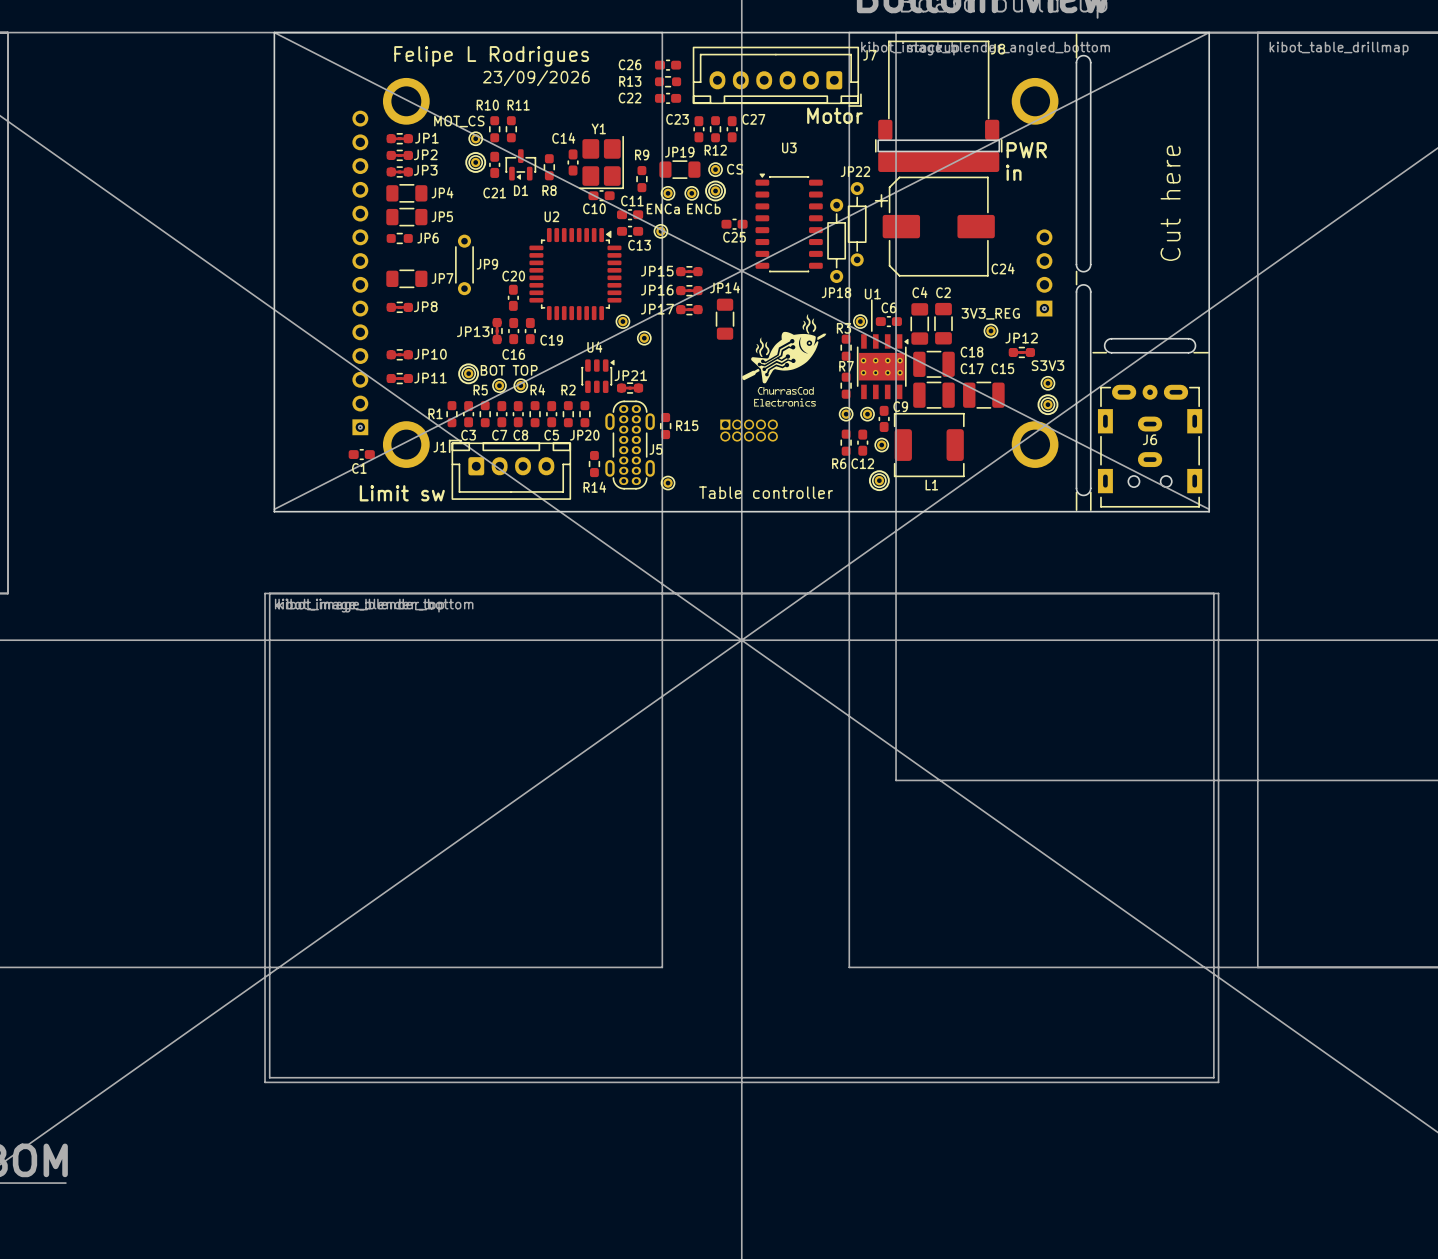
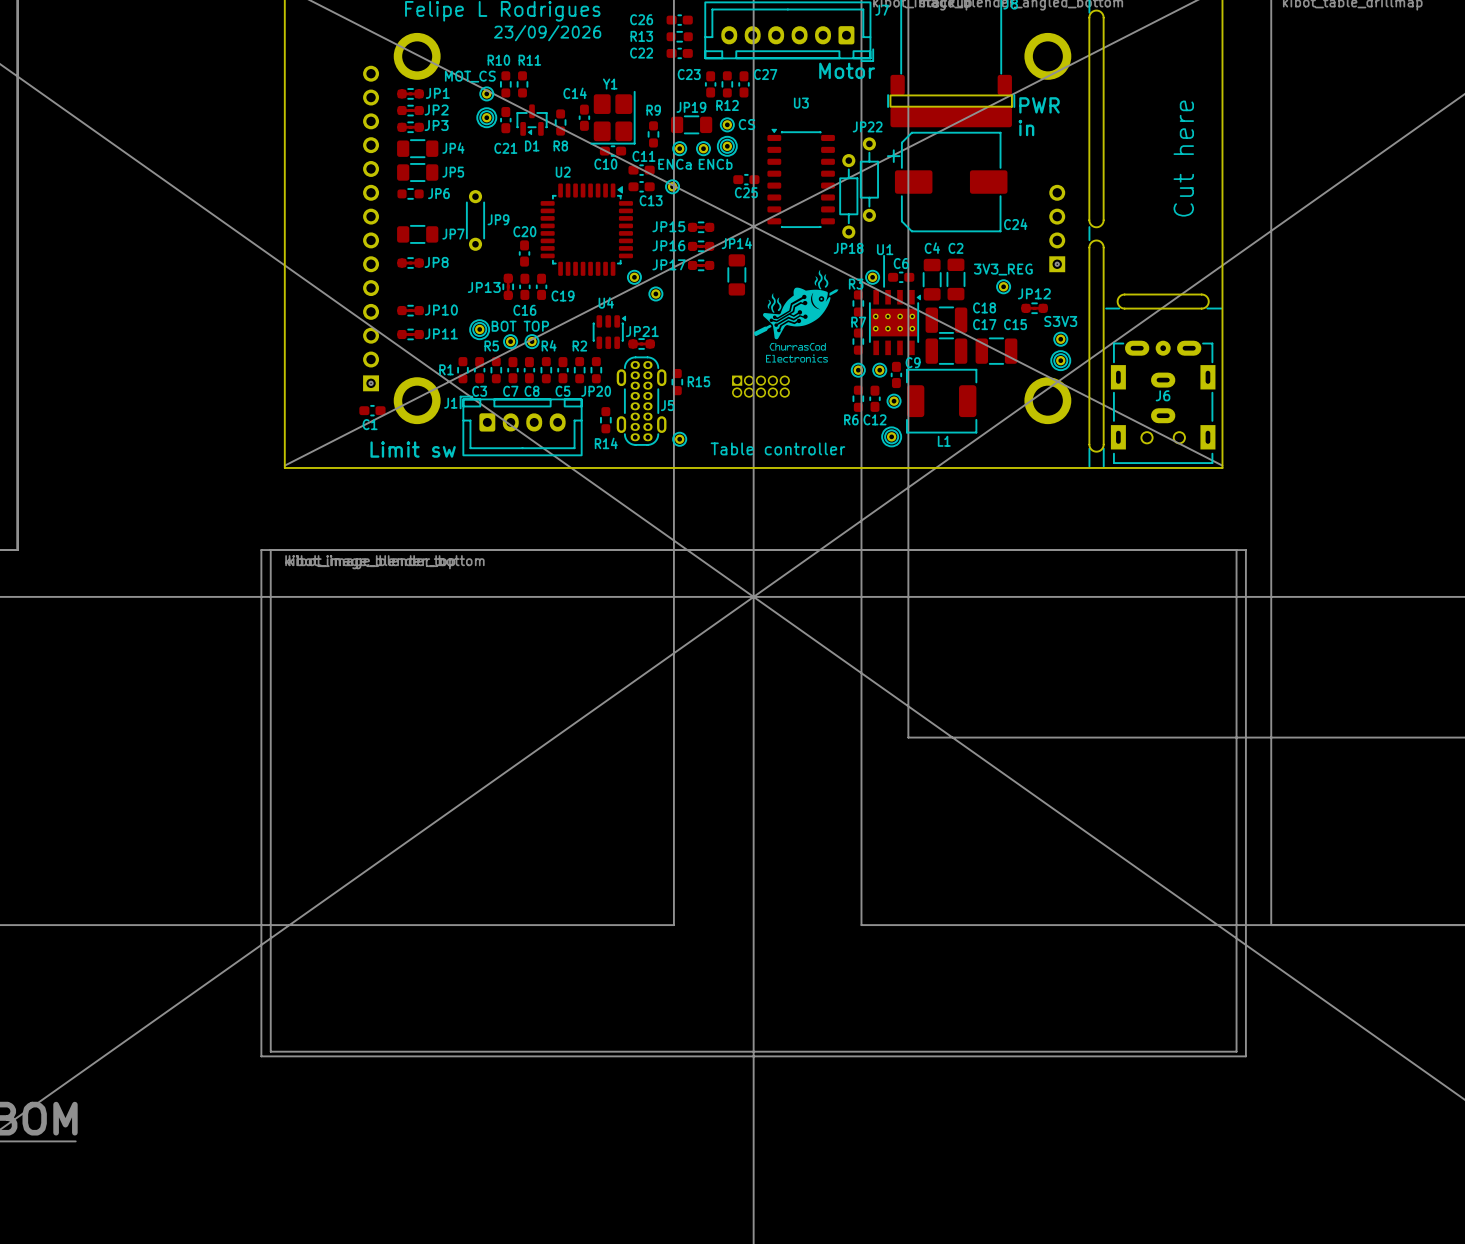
line: none -> (270, 550) (270, 1051) (1236, 1051) (1236, 550)
line: (265, 593) (265, 1082) (1218, 1082) (1218, 593) -> (275, 550) (261, 550) (261, 1056) (1245, 1056) (1245, 550) (1231, 550)
line: (269, 593) (269, 1077) (1213, 1077) (1213, 593) -> none

